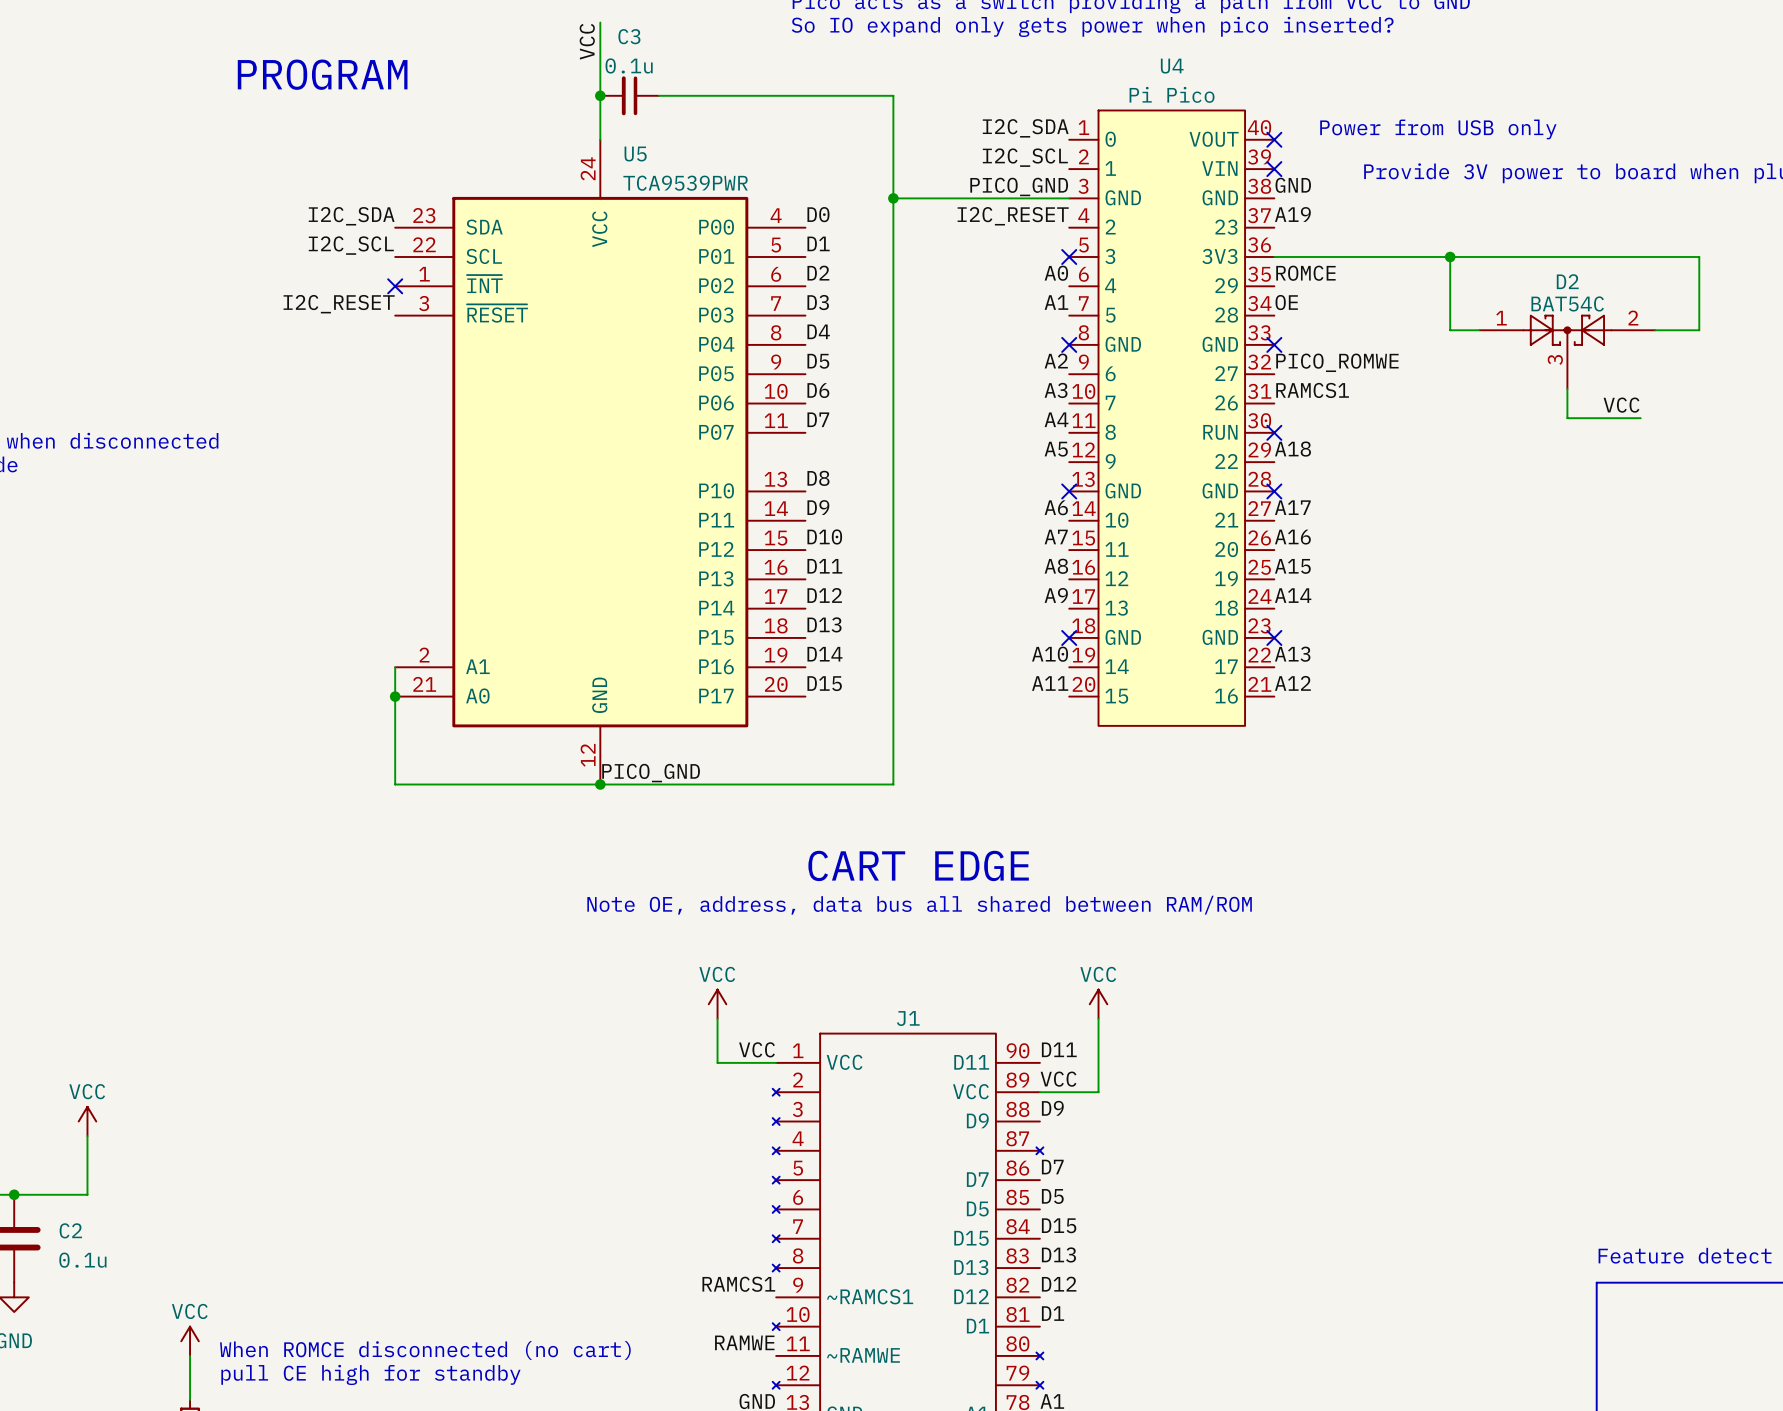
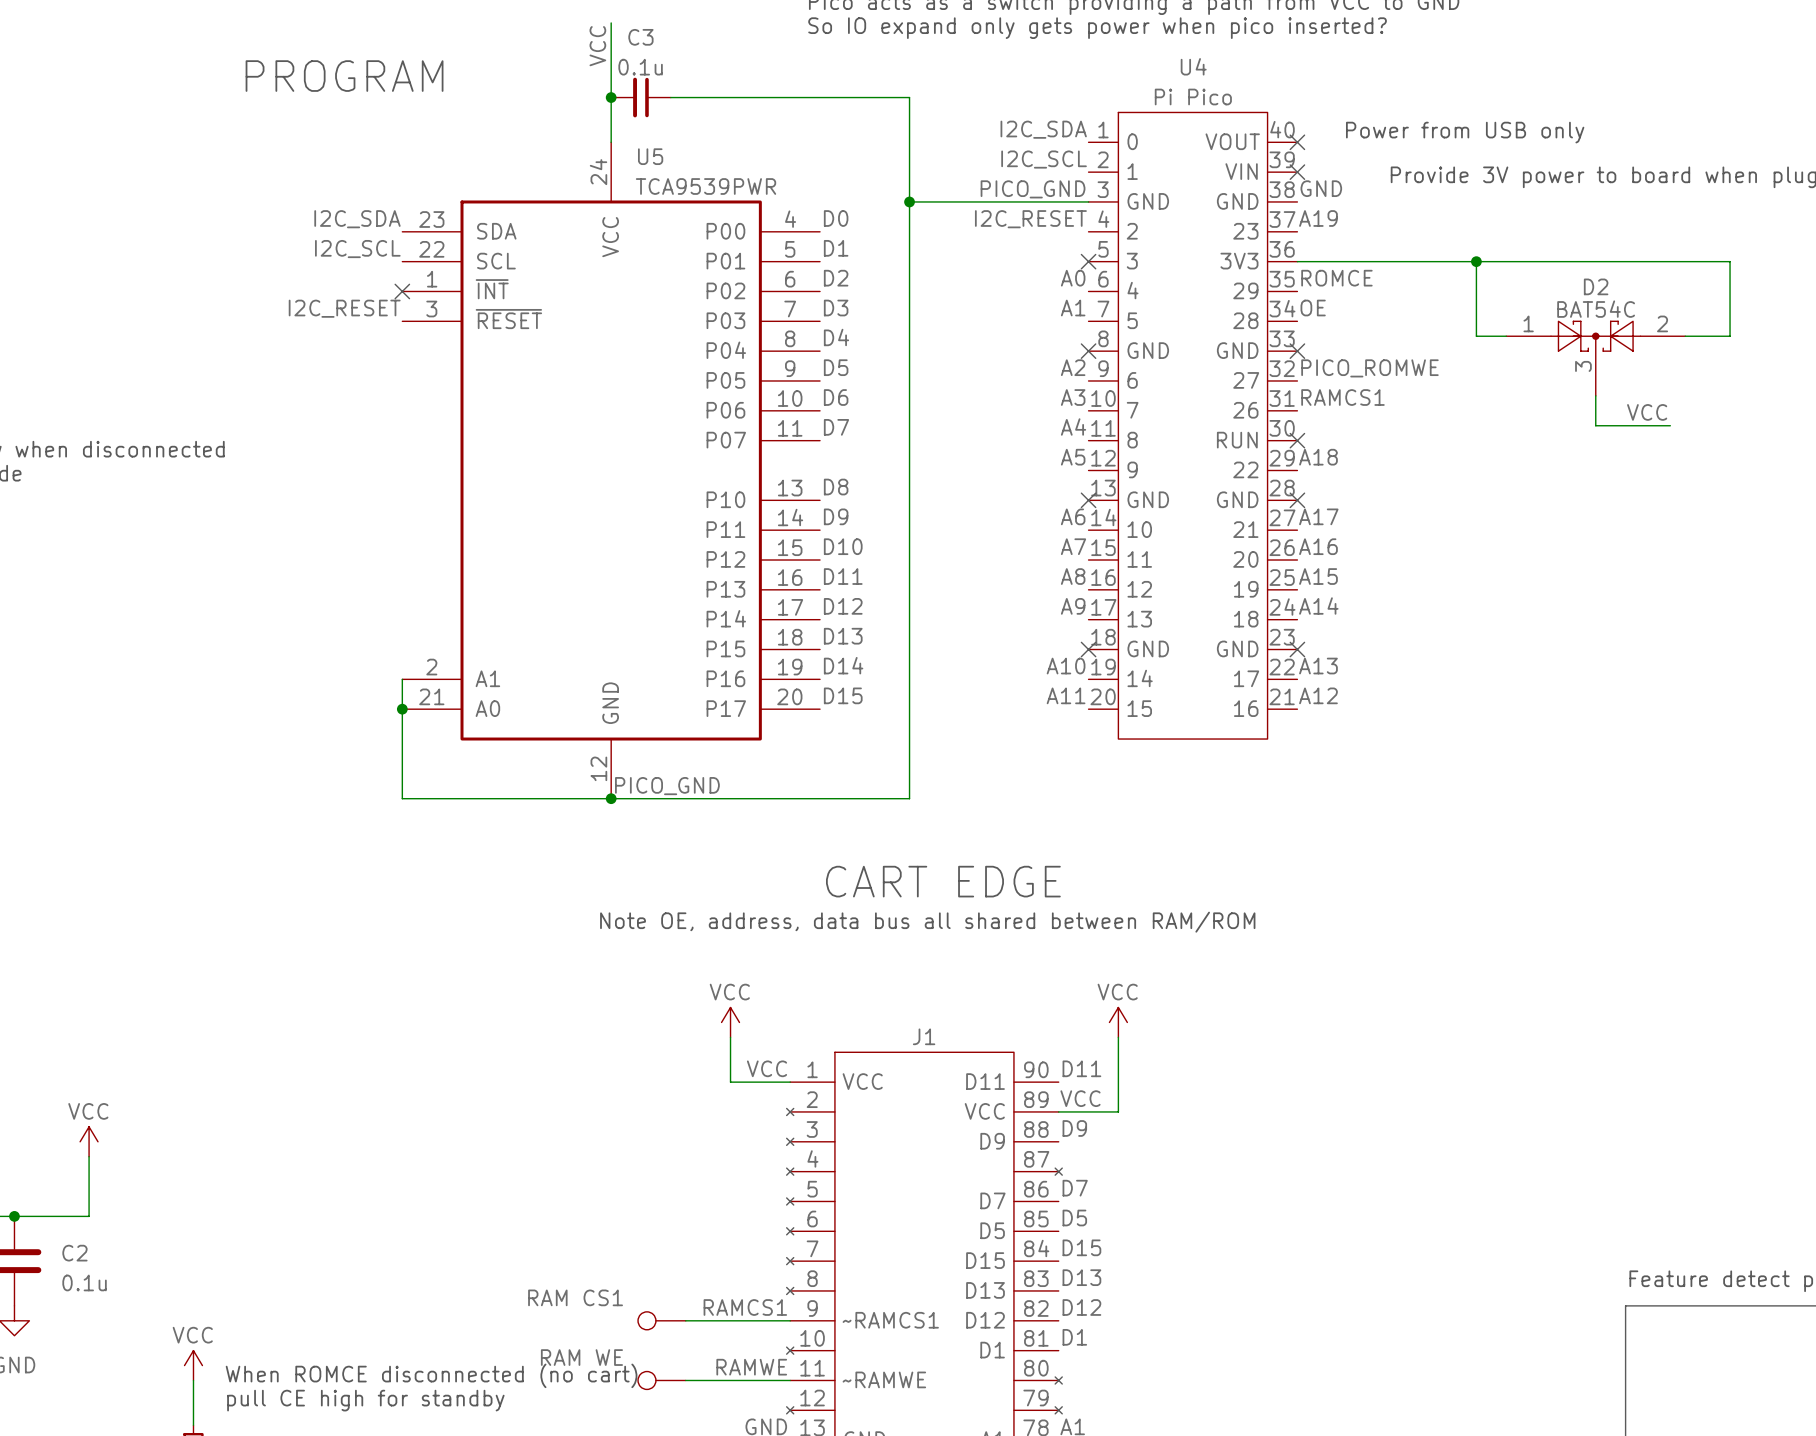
part: none -> RAM CS1 (661, 1320)
wire: none -> (685, 1320) (790, 1320)
part: none -> RAM WE (661, 1380)
wire: none -> (685, 1380) (790, 1380)

